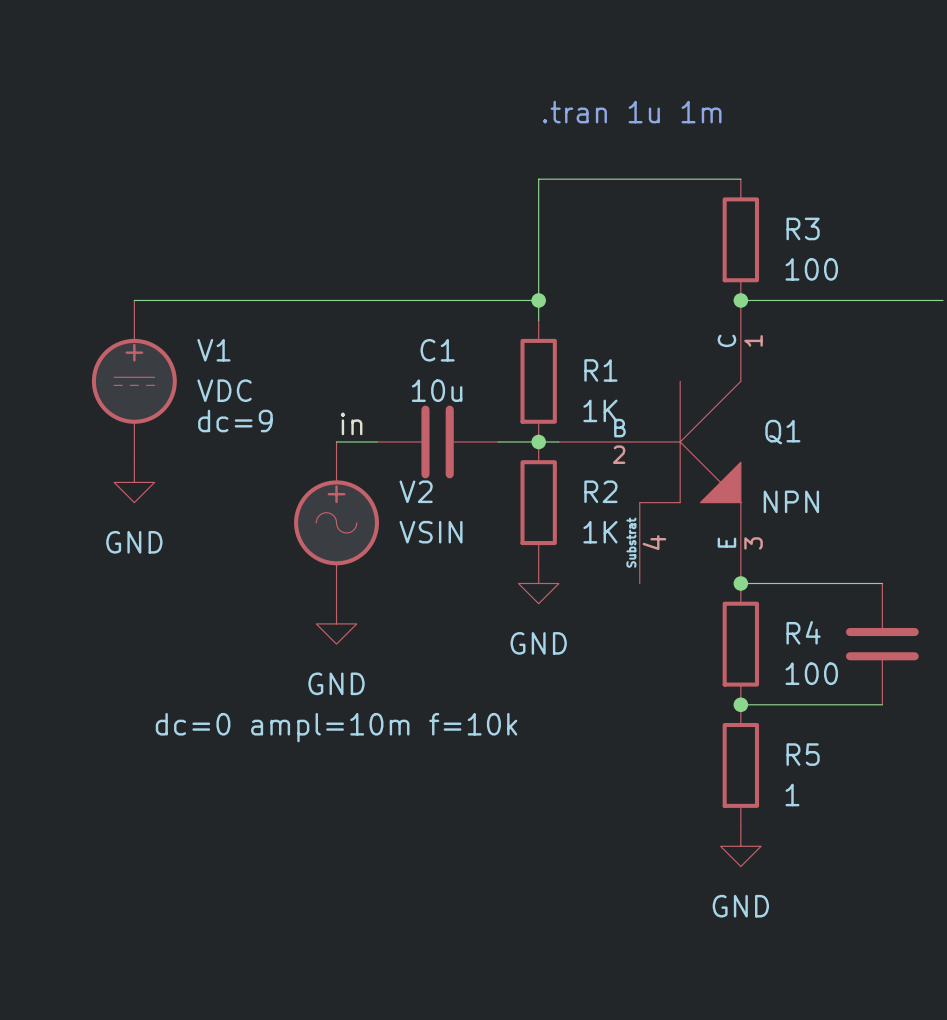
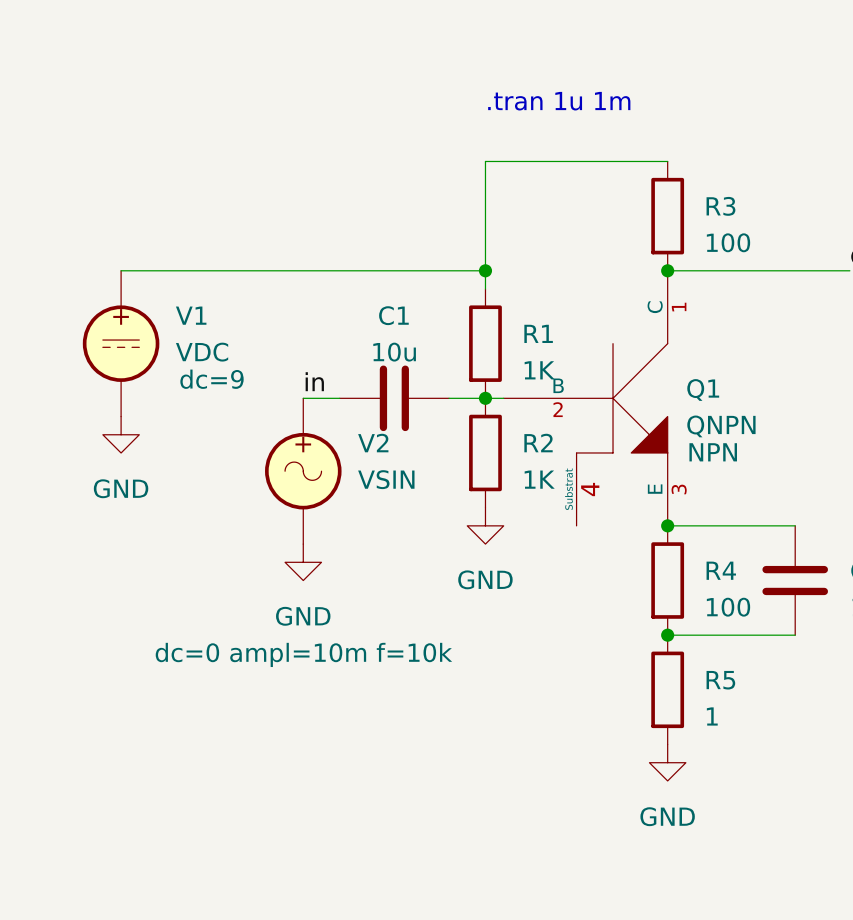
Q1 value: none -> QNPN (721, 426)

